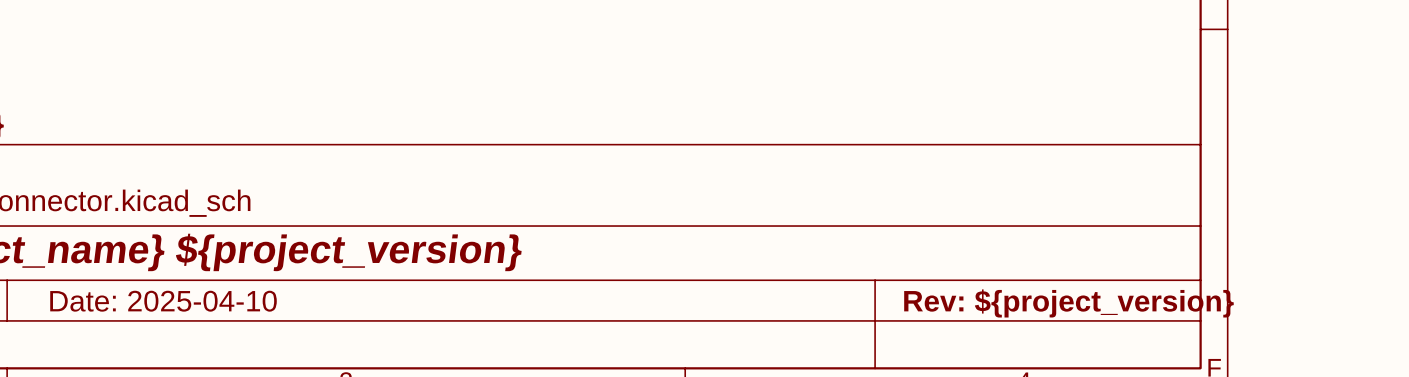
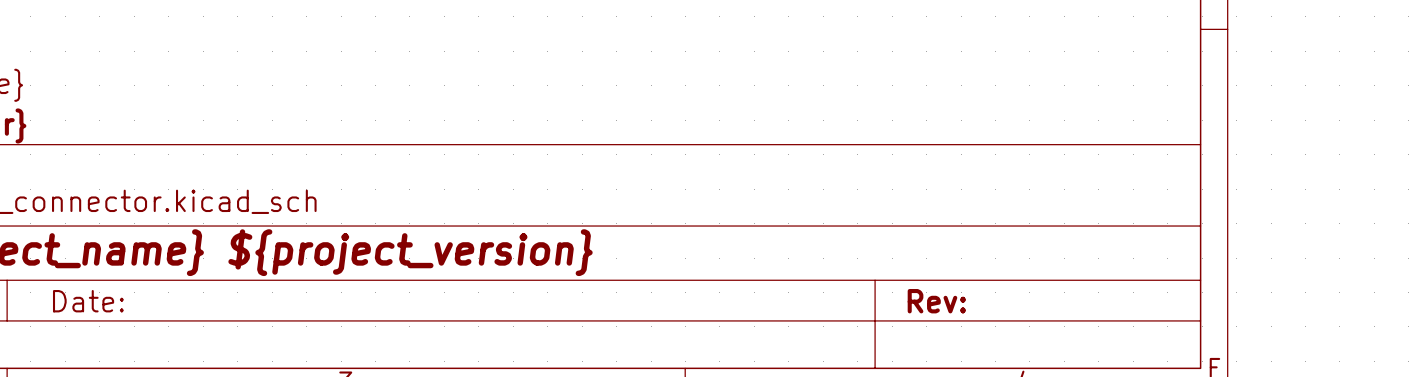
title block: Date: 2025-04-10 (163, 301) -> Date: (88, 301)
title block: Rev: ${project_version} (1068, 303) -> Rev: (936, 301)

